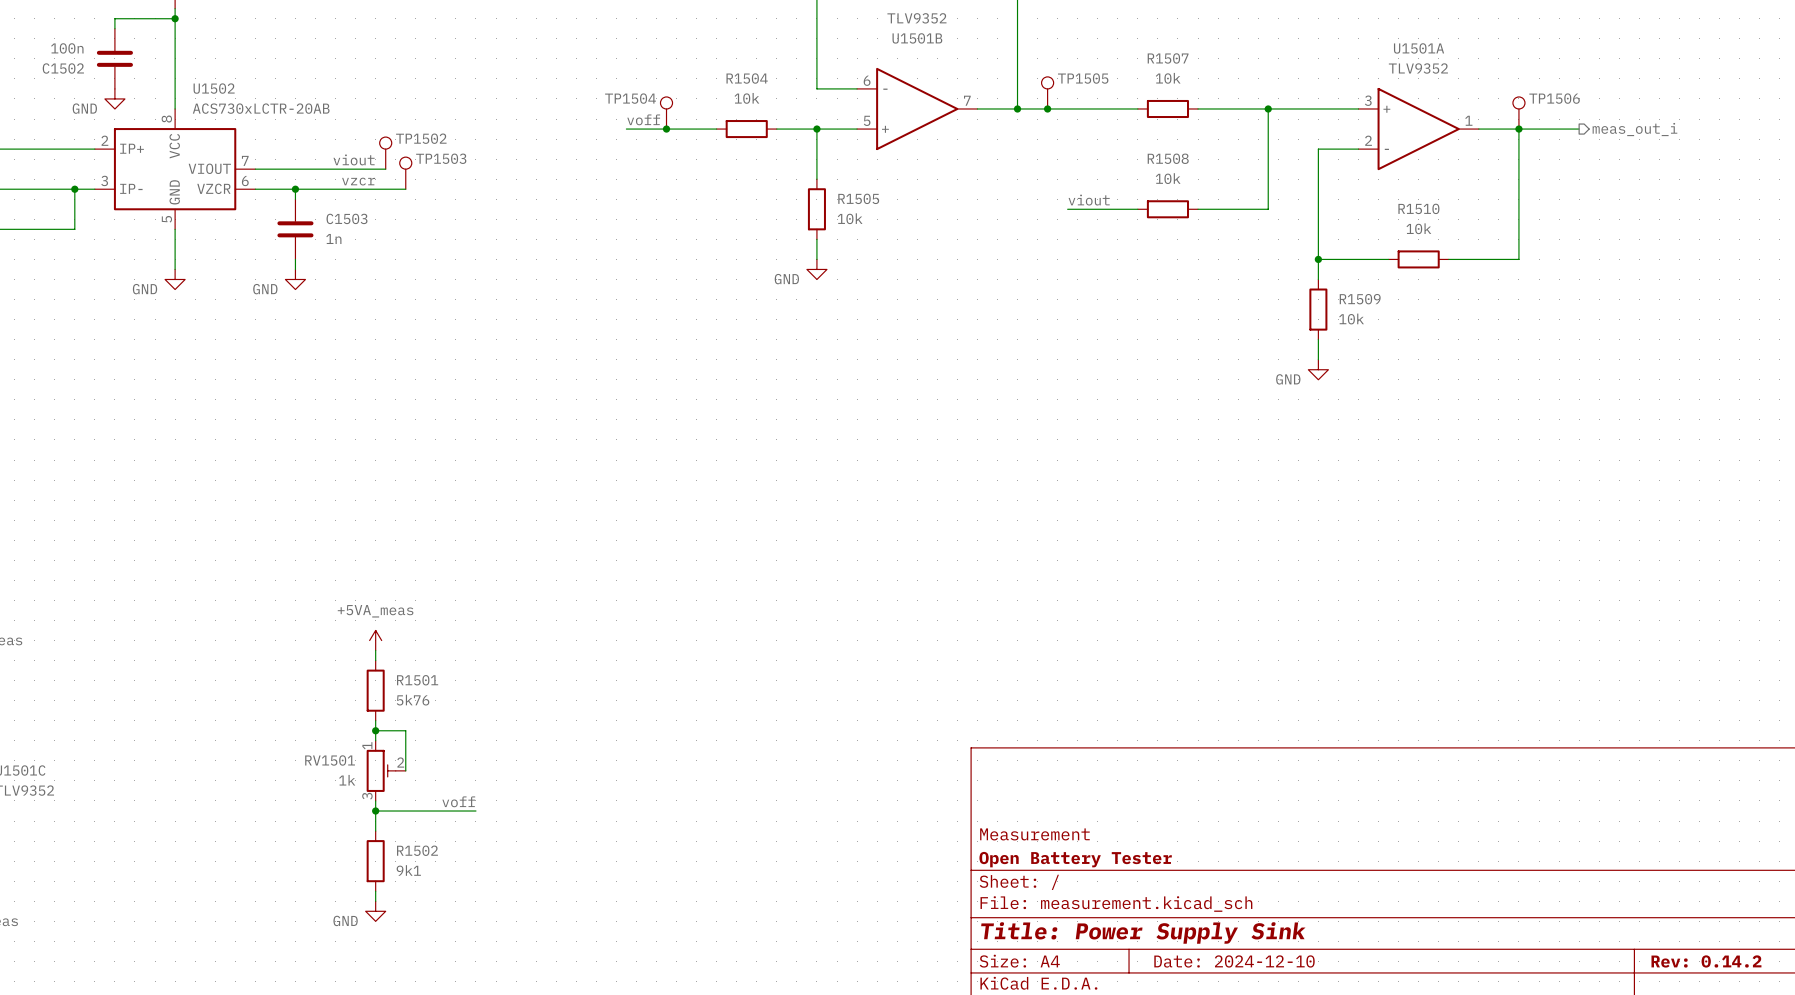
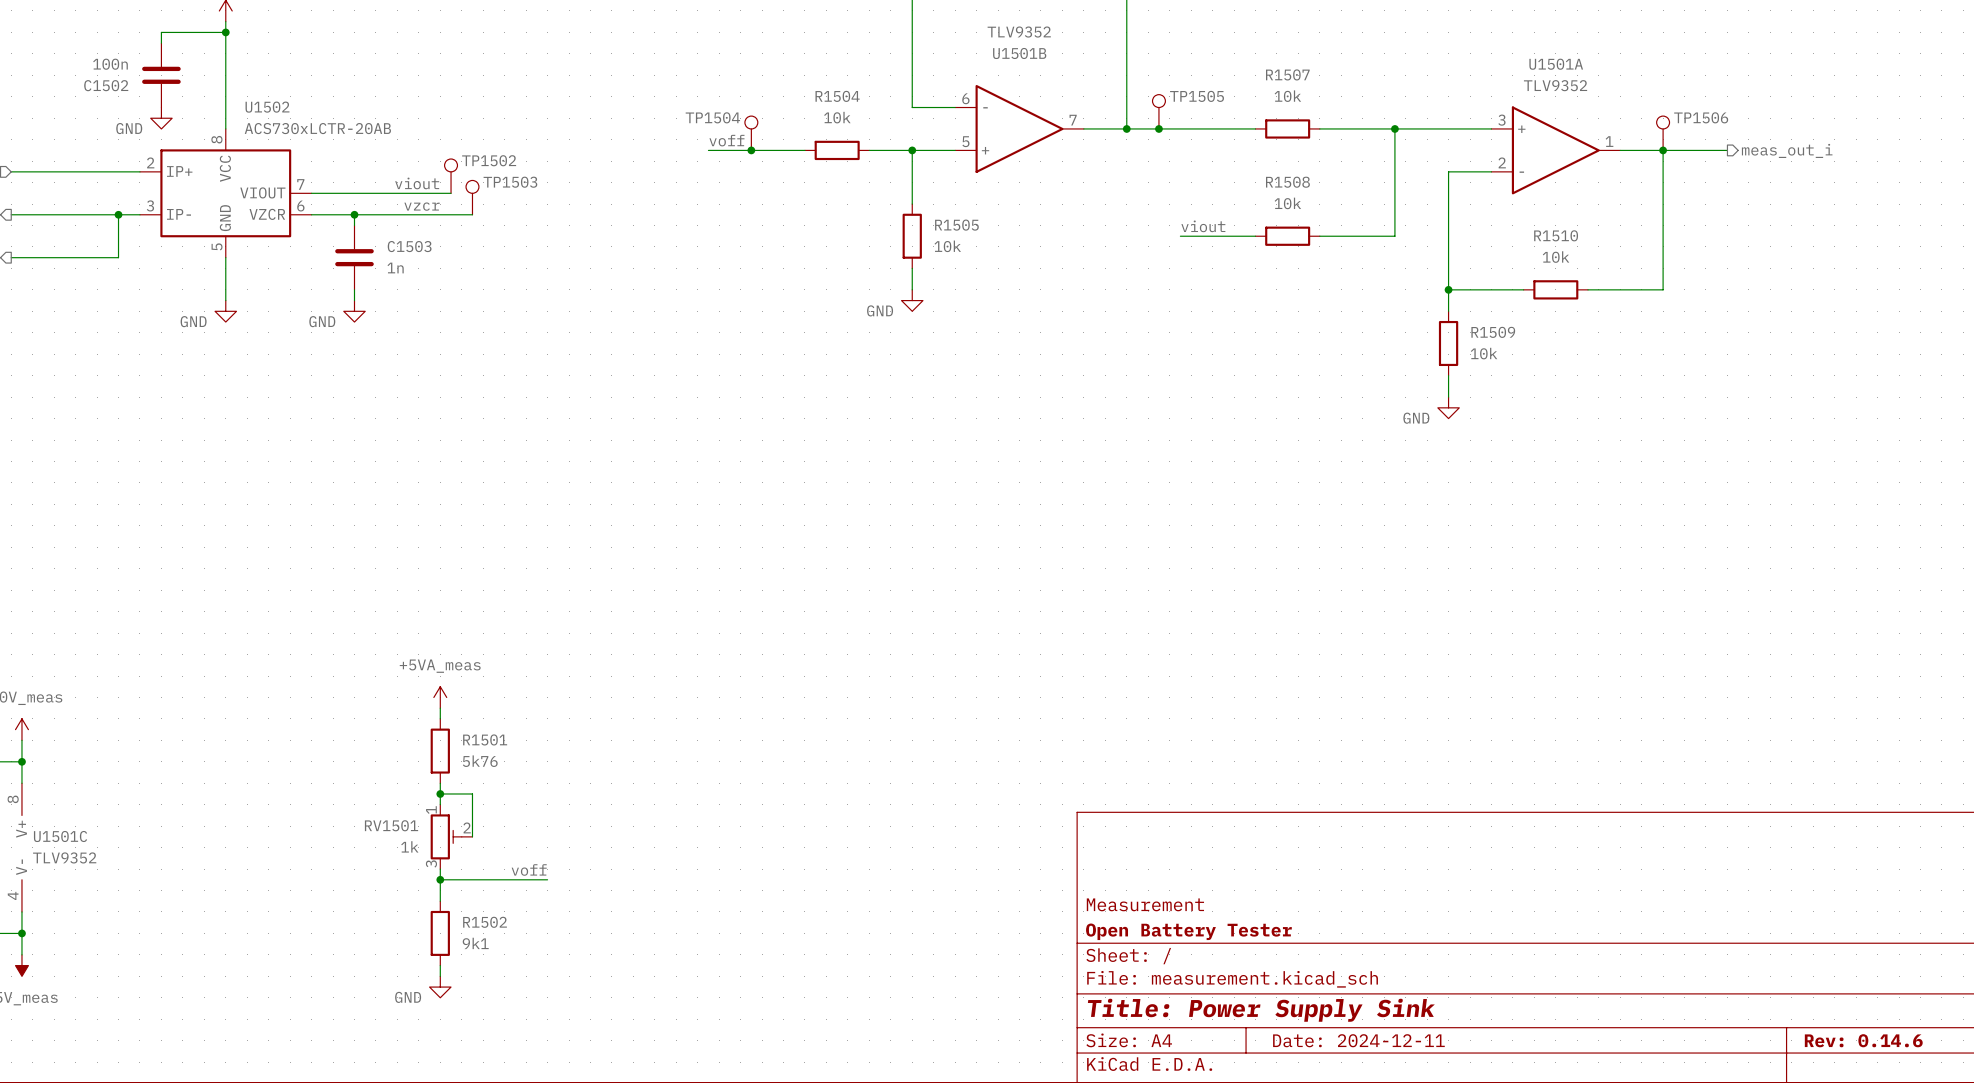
title block: Date: 2024-12-10 (1234, 961) -> Date: 2024-12-11 (1358, 1040)
title block: Rev: 0.14.2 (1706, 961) -> Rev: 0.14.6 (1863, 1040)

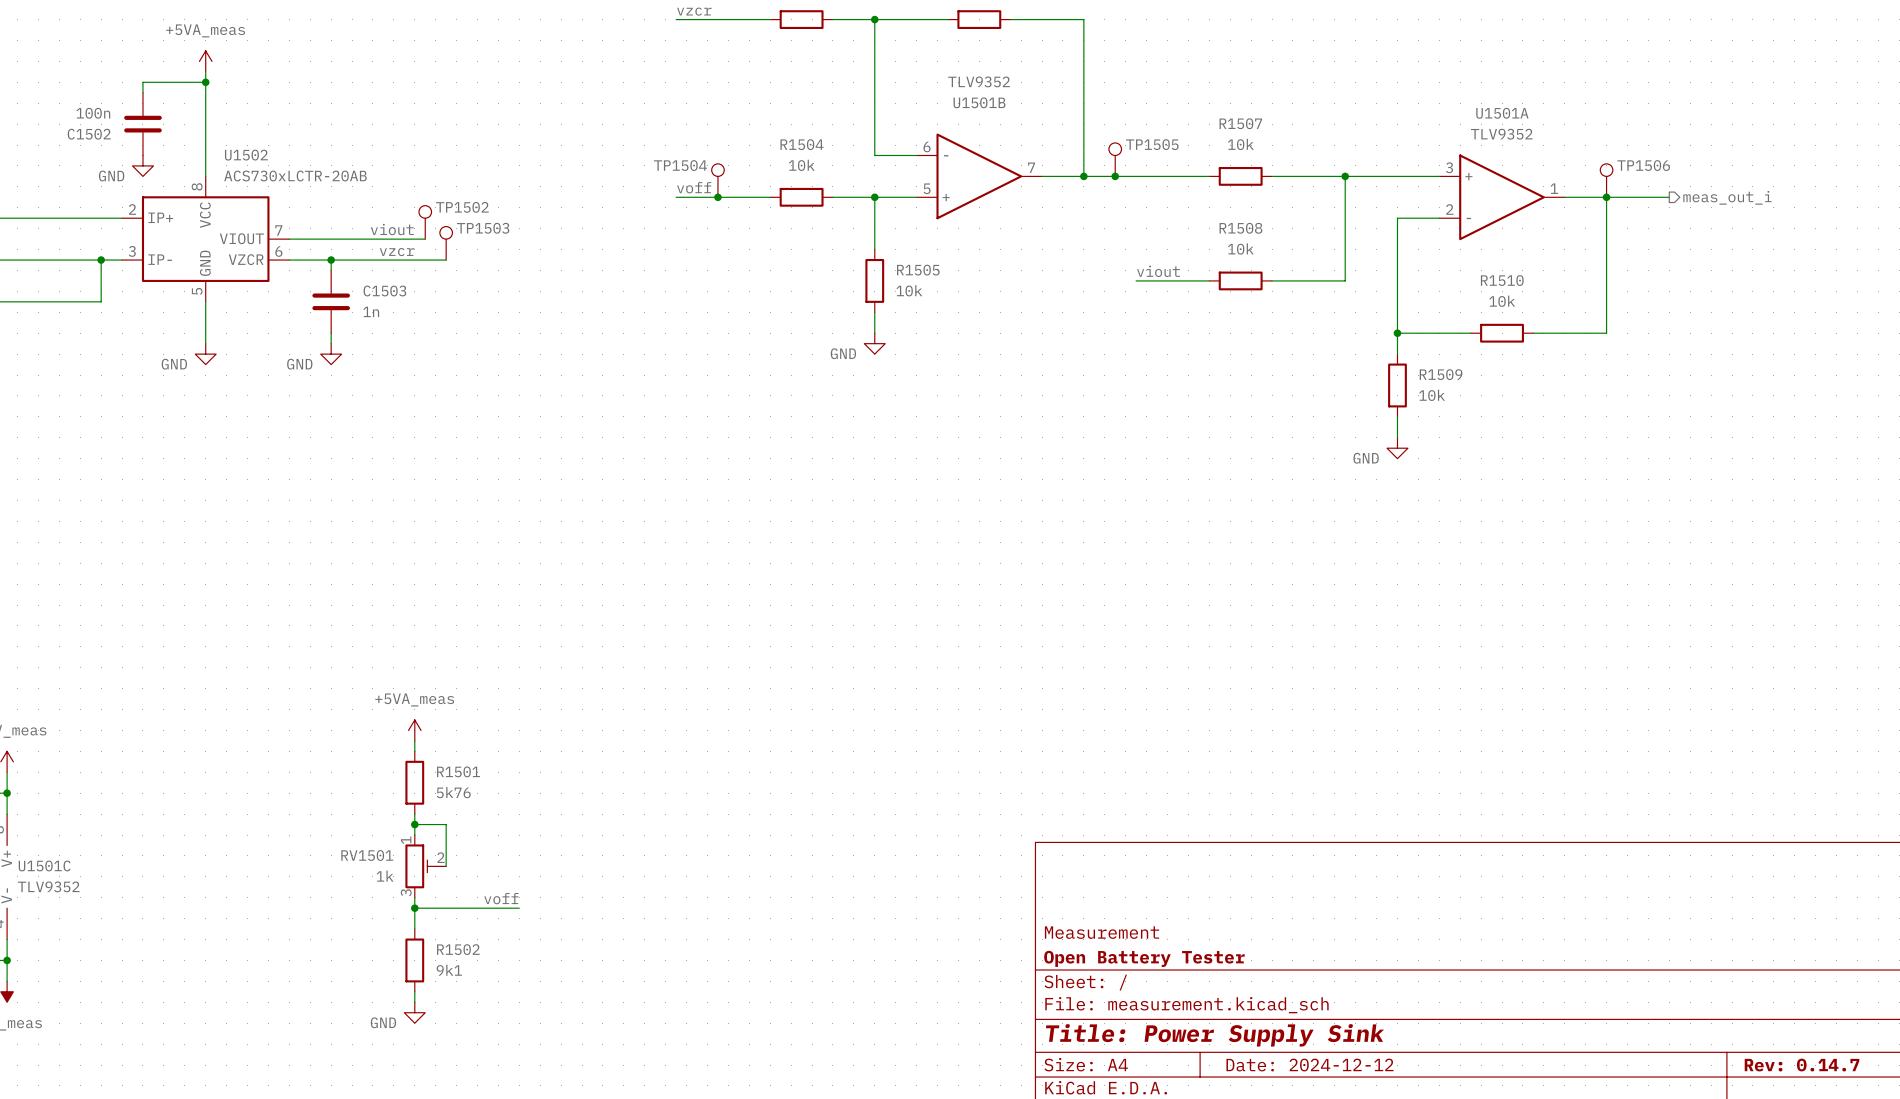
title block: Date: 2024-12-11 (1358, 1040) -> Date: 2024-12-12 (1309, 1065)
title block: Rev: 0.14.6 (1863, 1040) -> Rev: 0.14.7 (1802, 1065)

